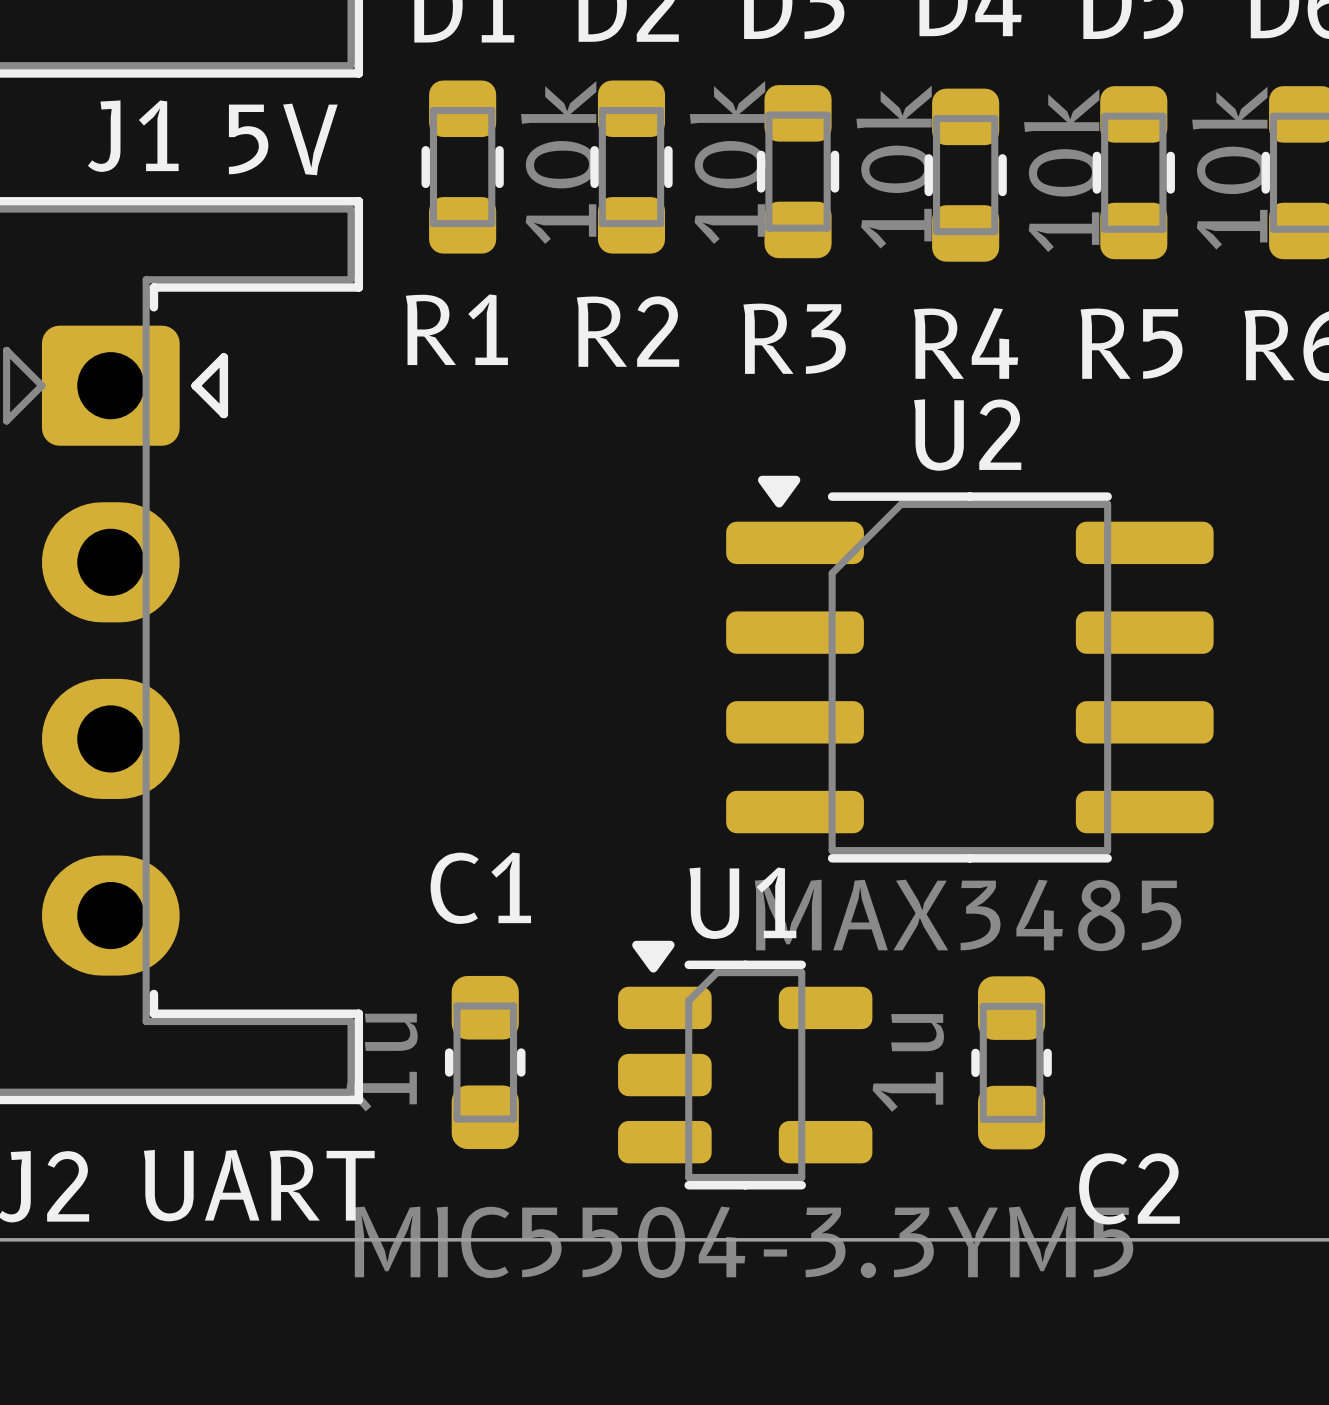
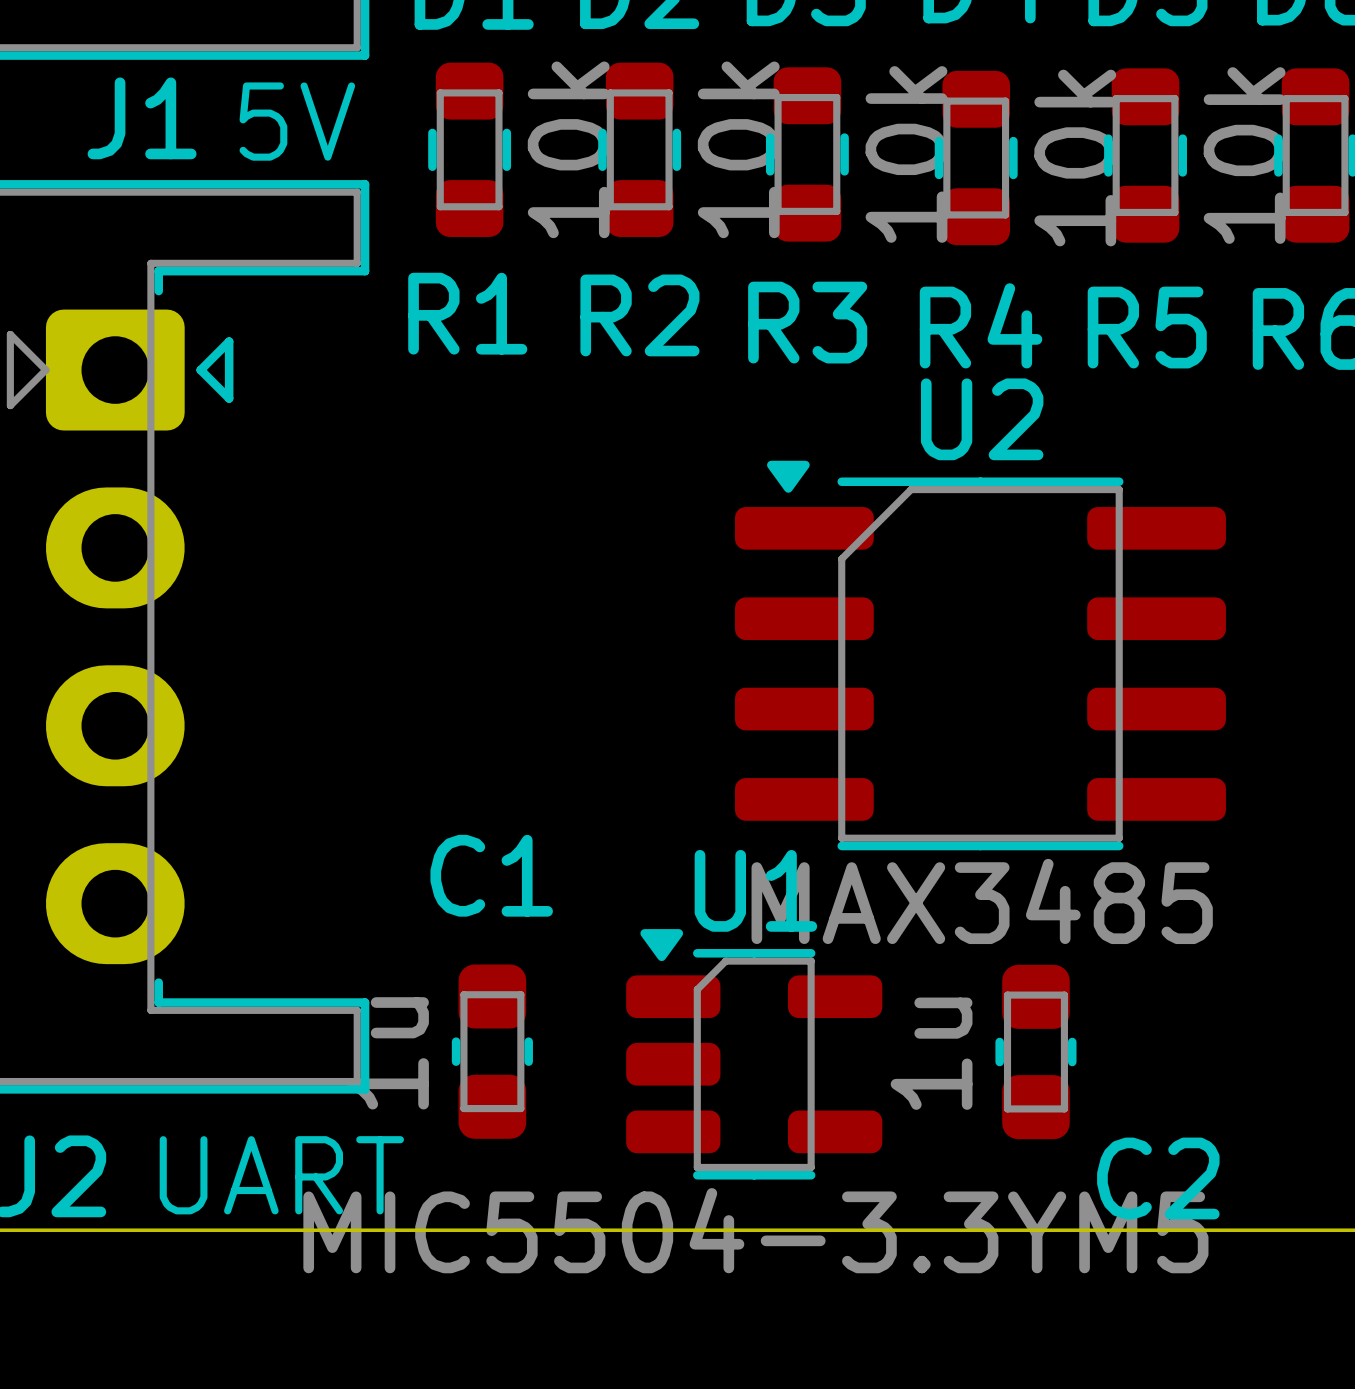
C2 position: (1011, 1062) -> (1035, 1052)

